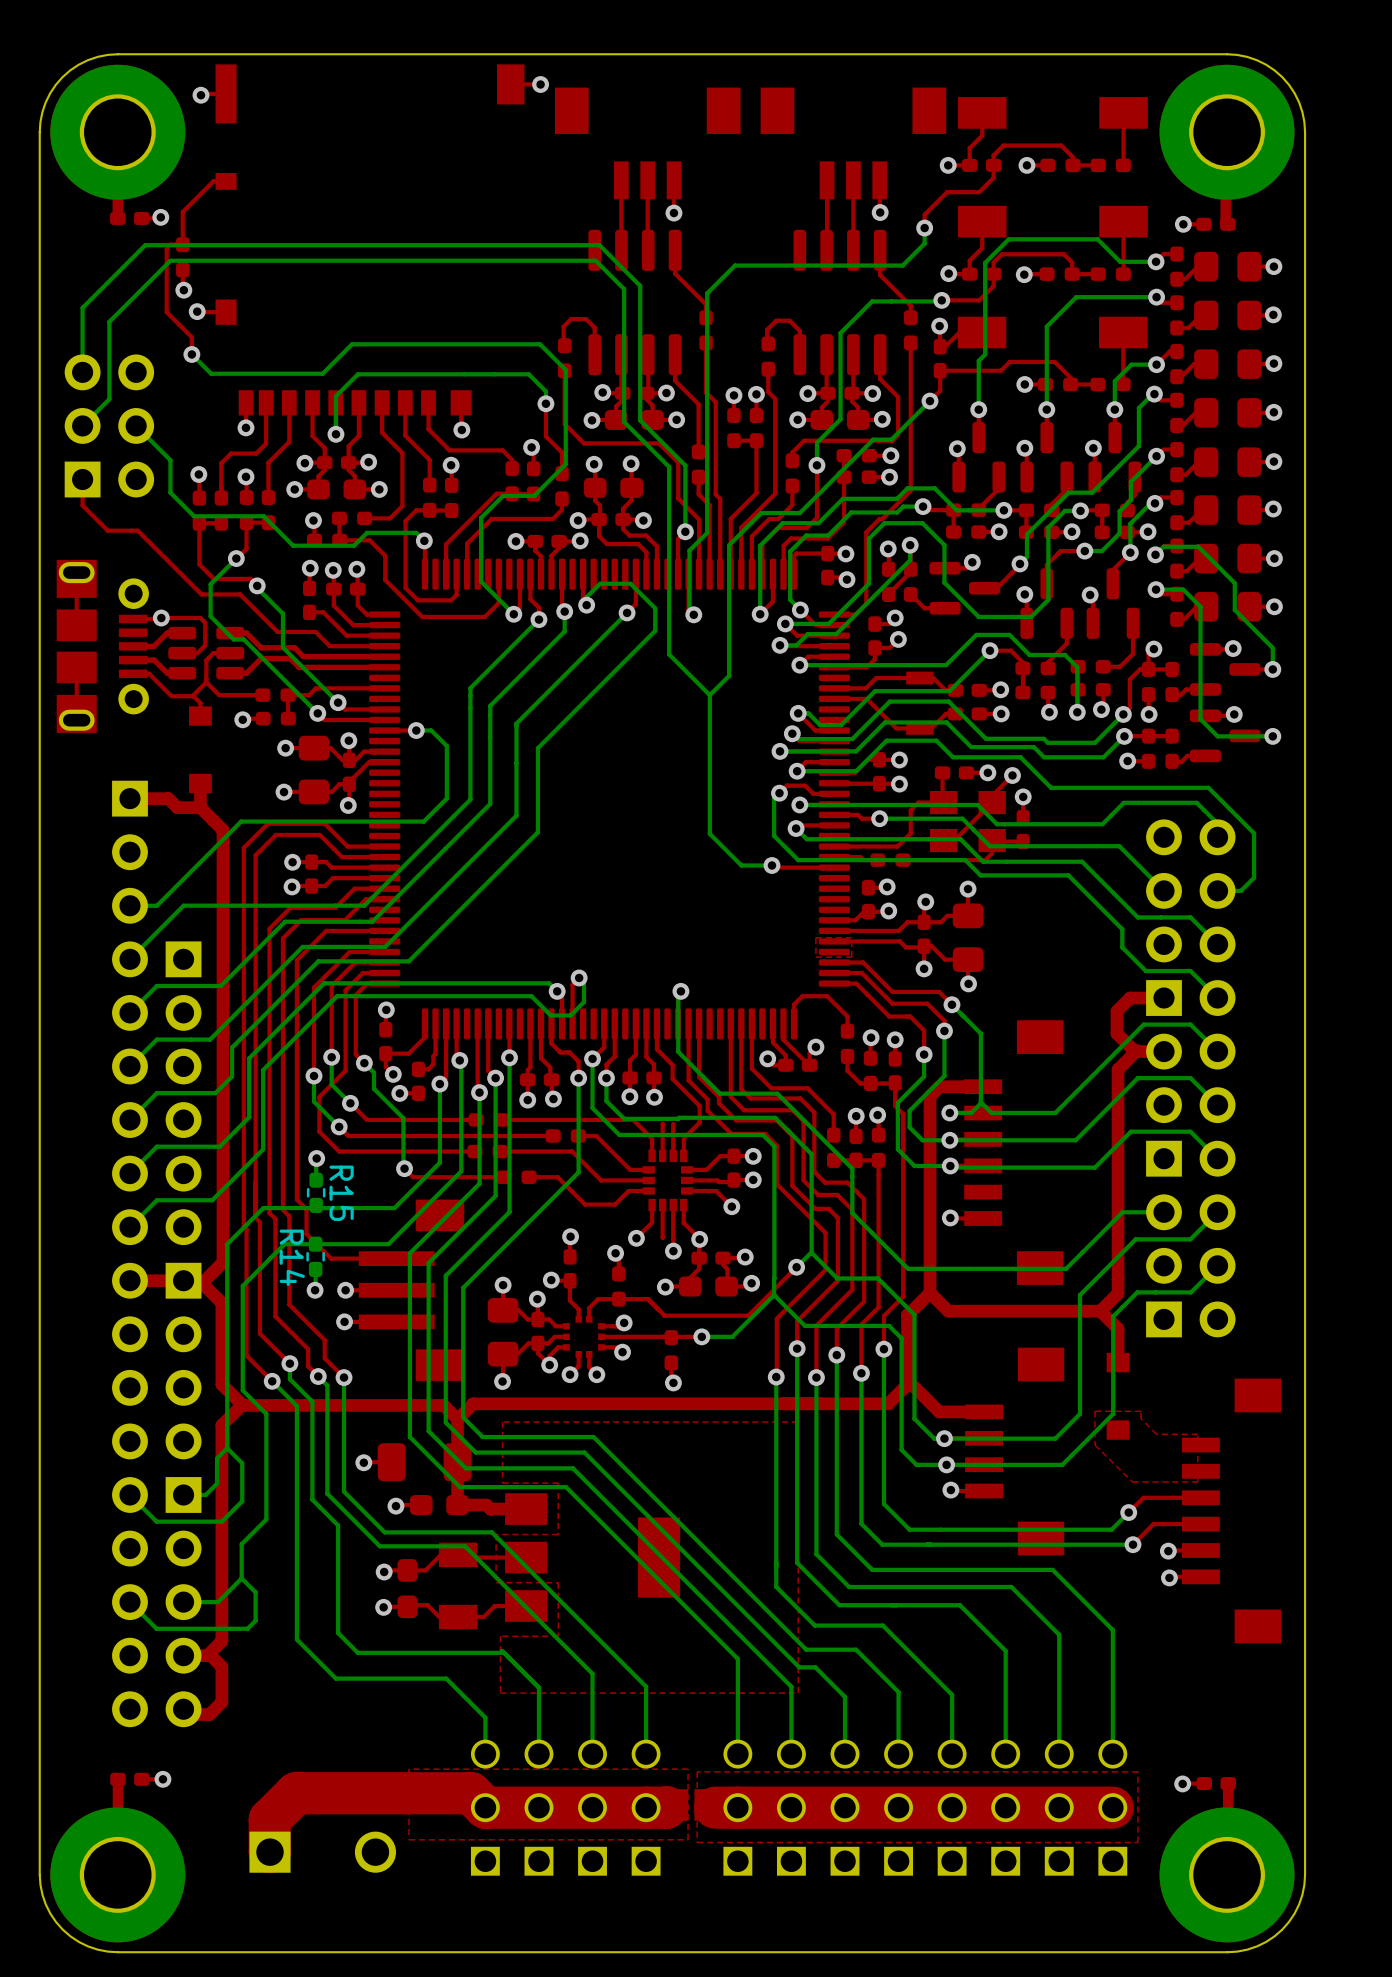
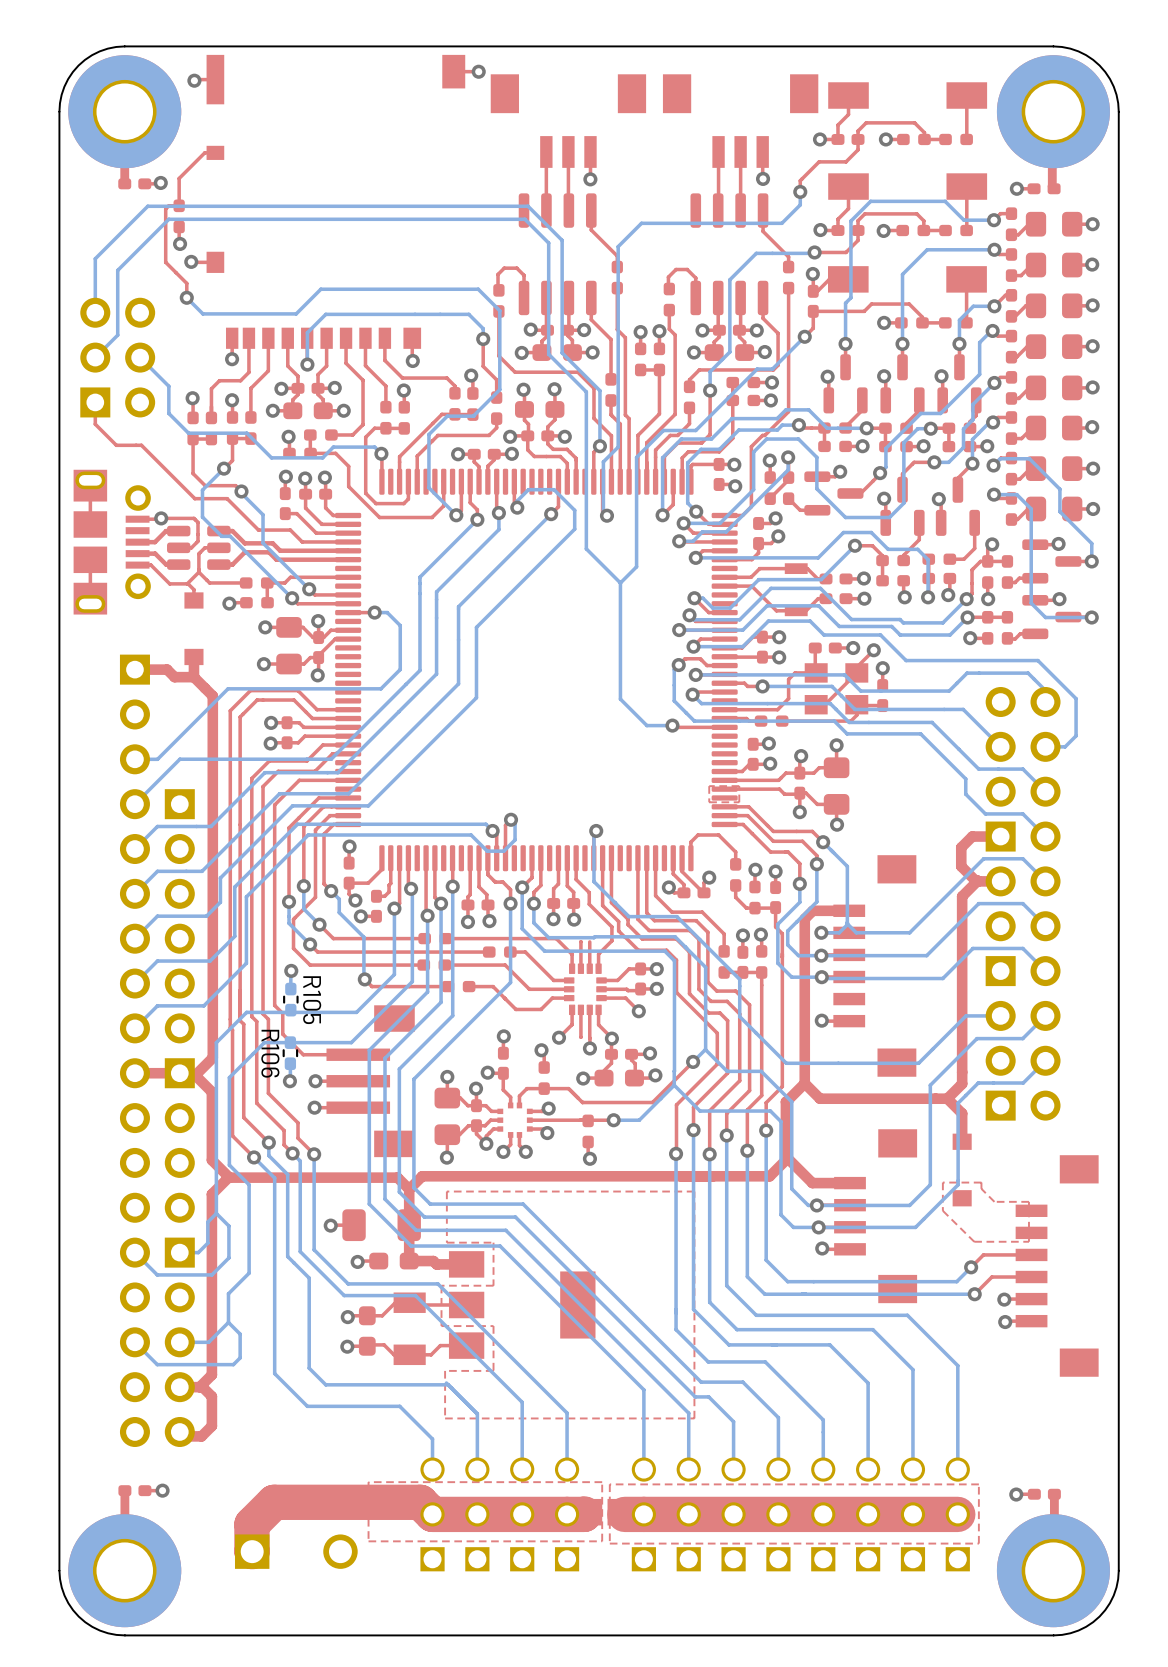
R15 name: R15 (341, 1193) -> R105 (312, 1000)
R14 name: R14 (292, 1257) -> R106 (270, 1053)

